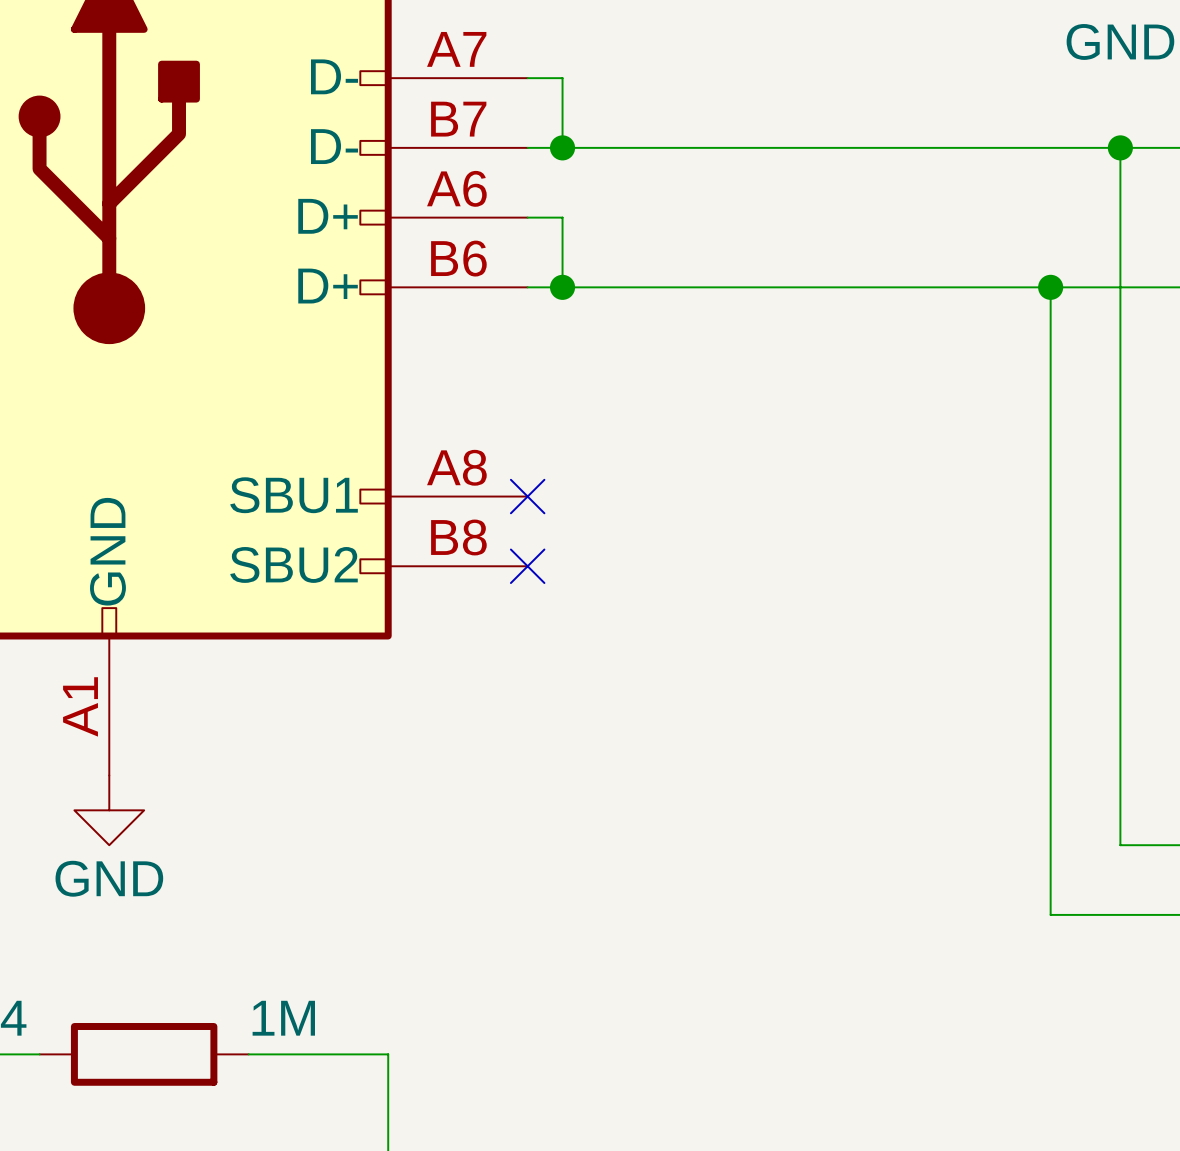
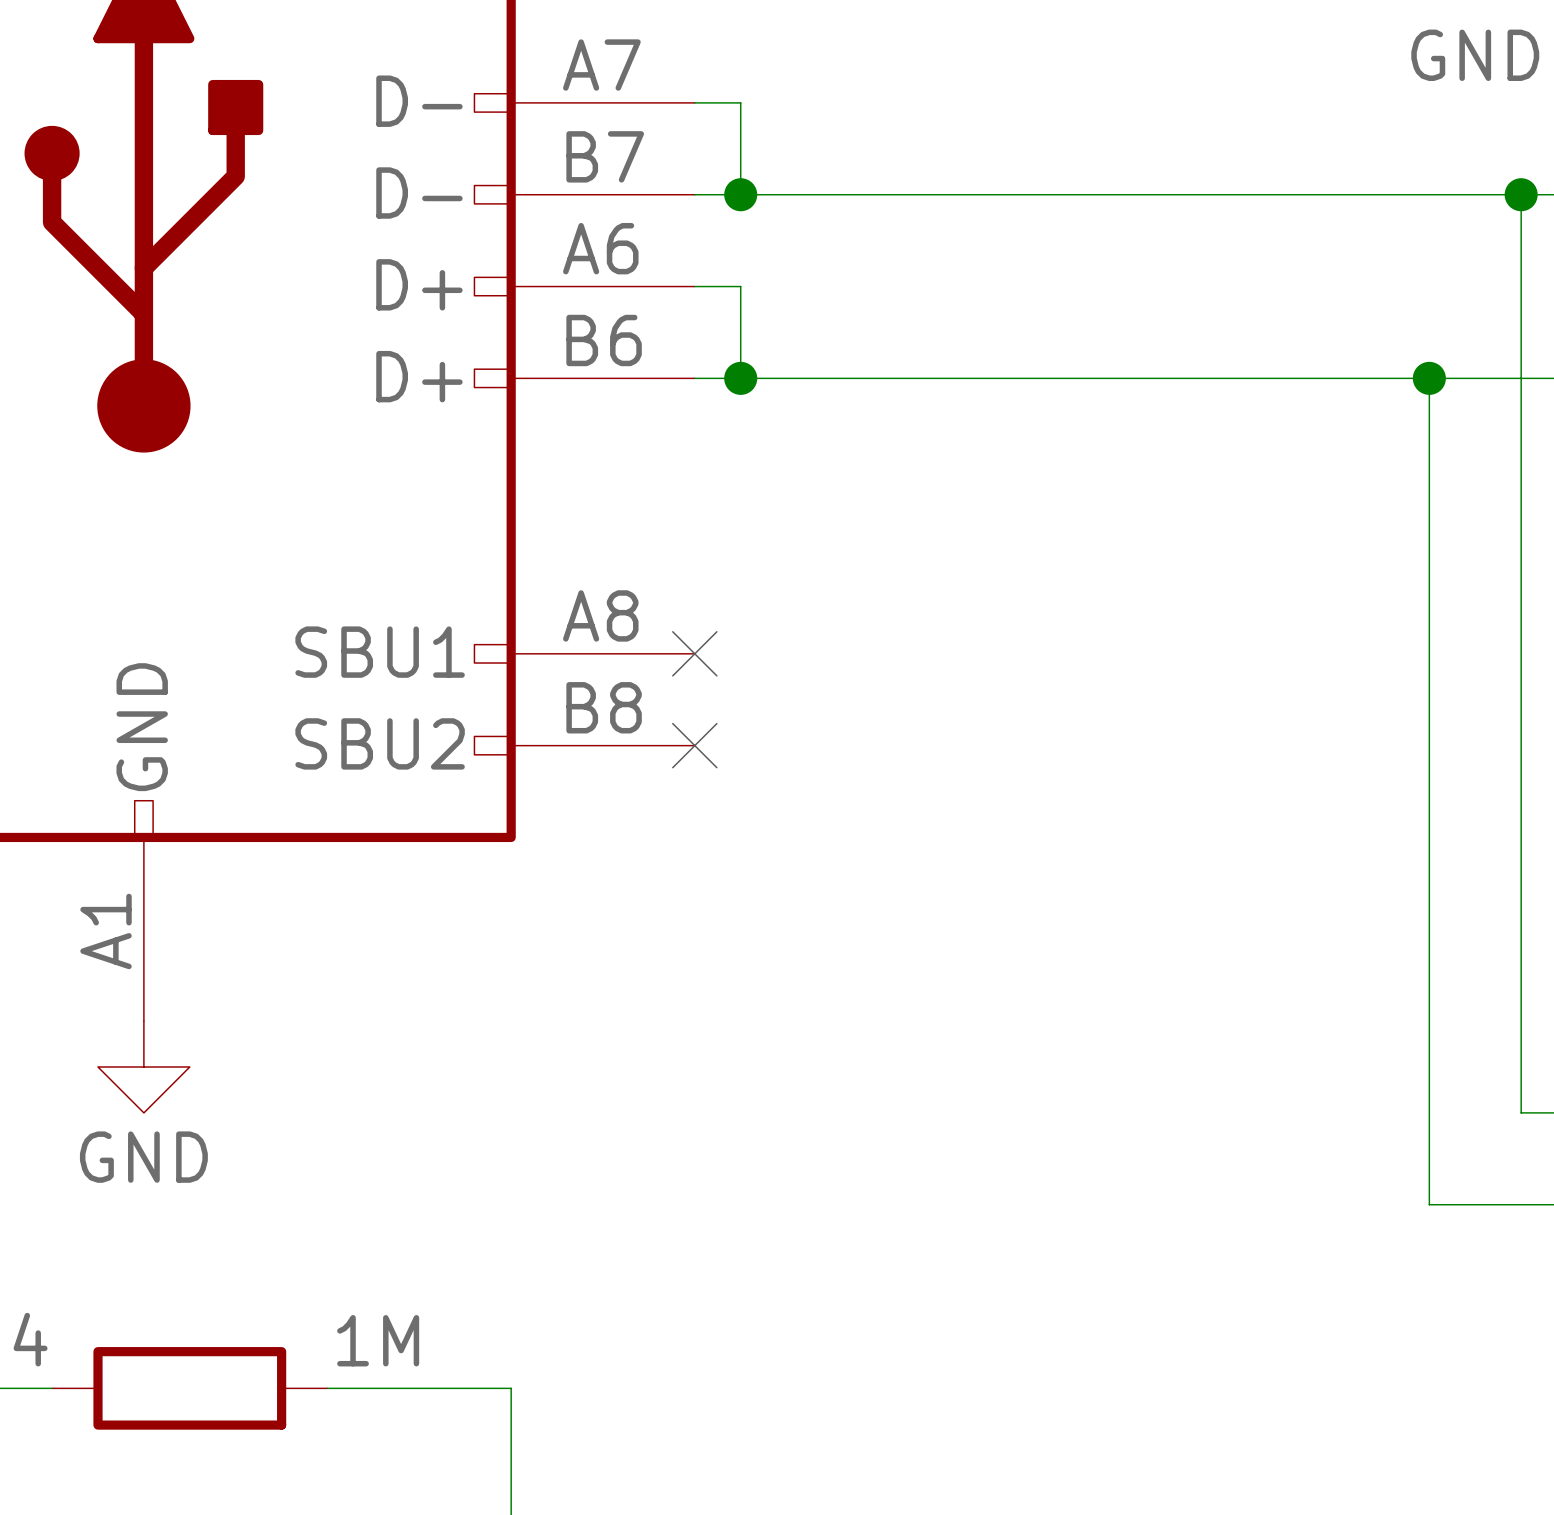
wire: (1120, 147) (1120, 845) (1155, 845) -> (1521, 194) (1521, 1112)
junction position: (1120, 147) -> (1521, 194)
wire: (1050, 287) (1050, 914) (1085, 914) -> (1429, 378) (1429, 1204)
junction position: (1050, 287) -> (1429, 378)

